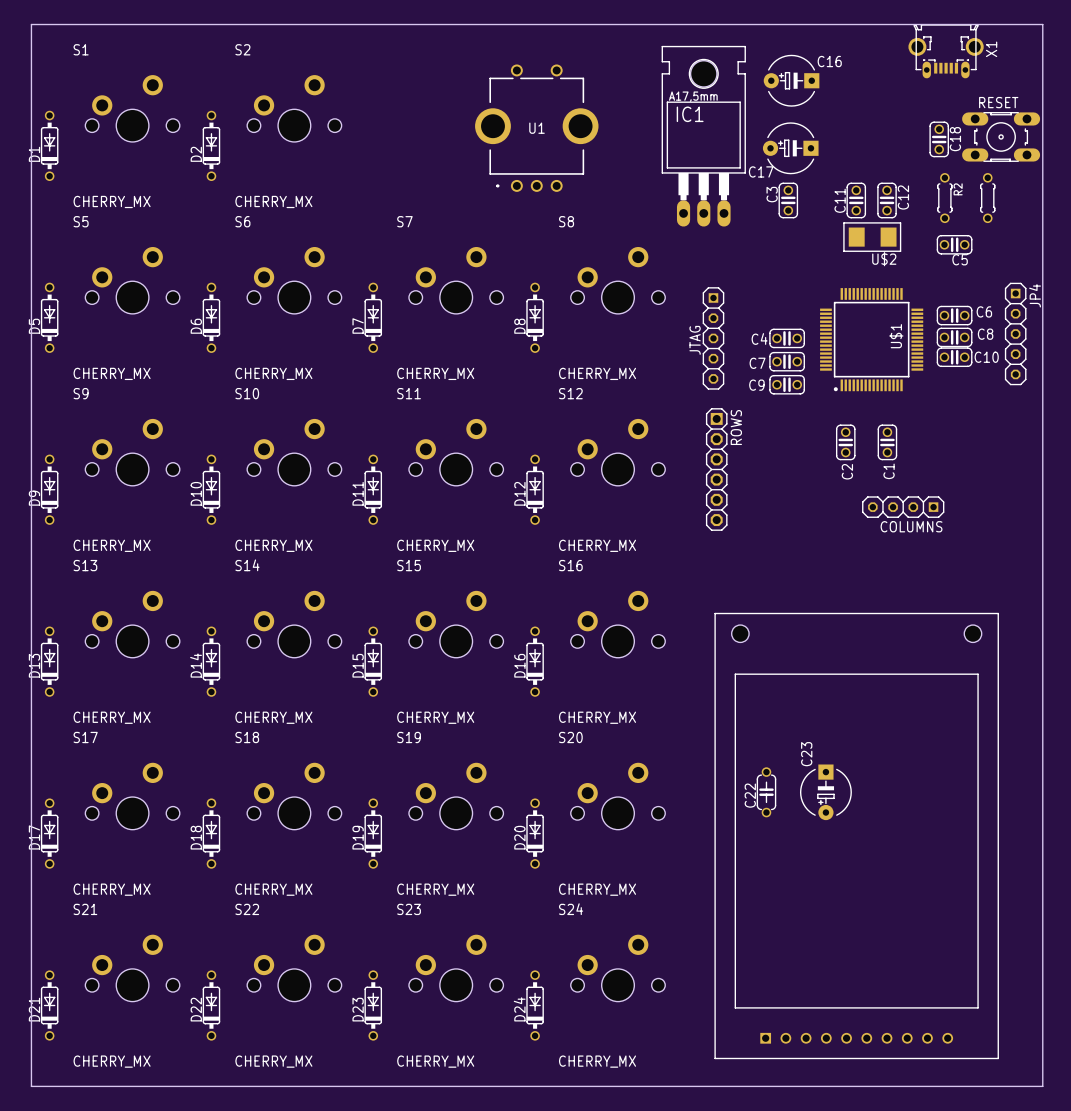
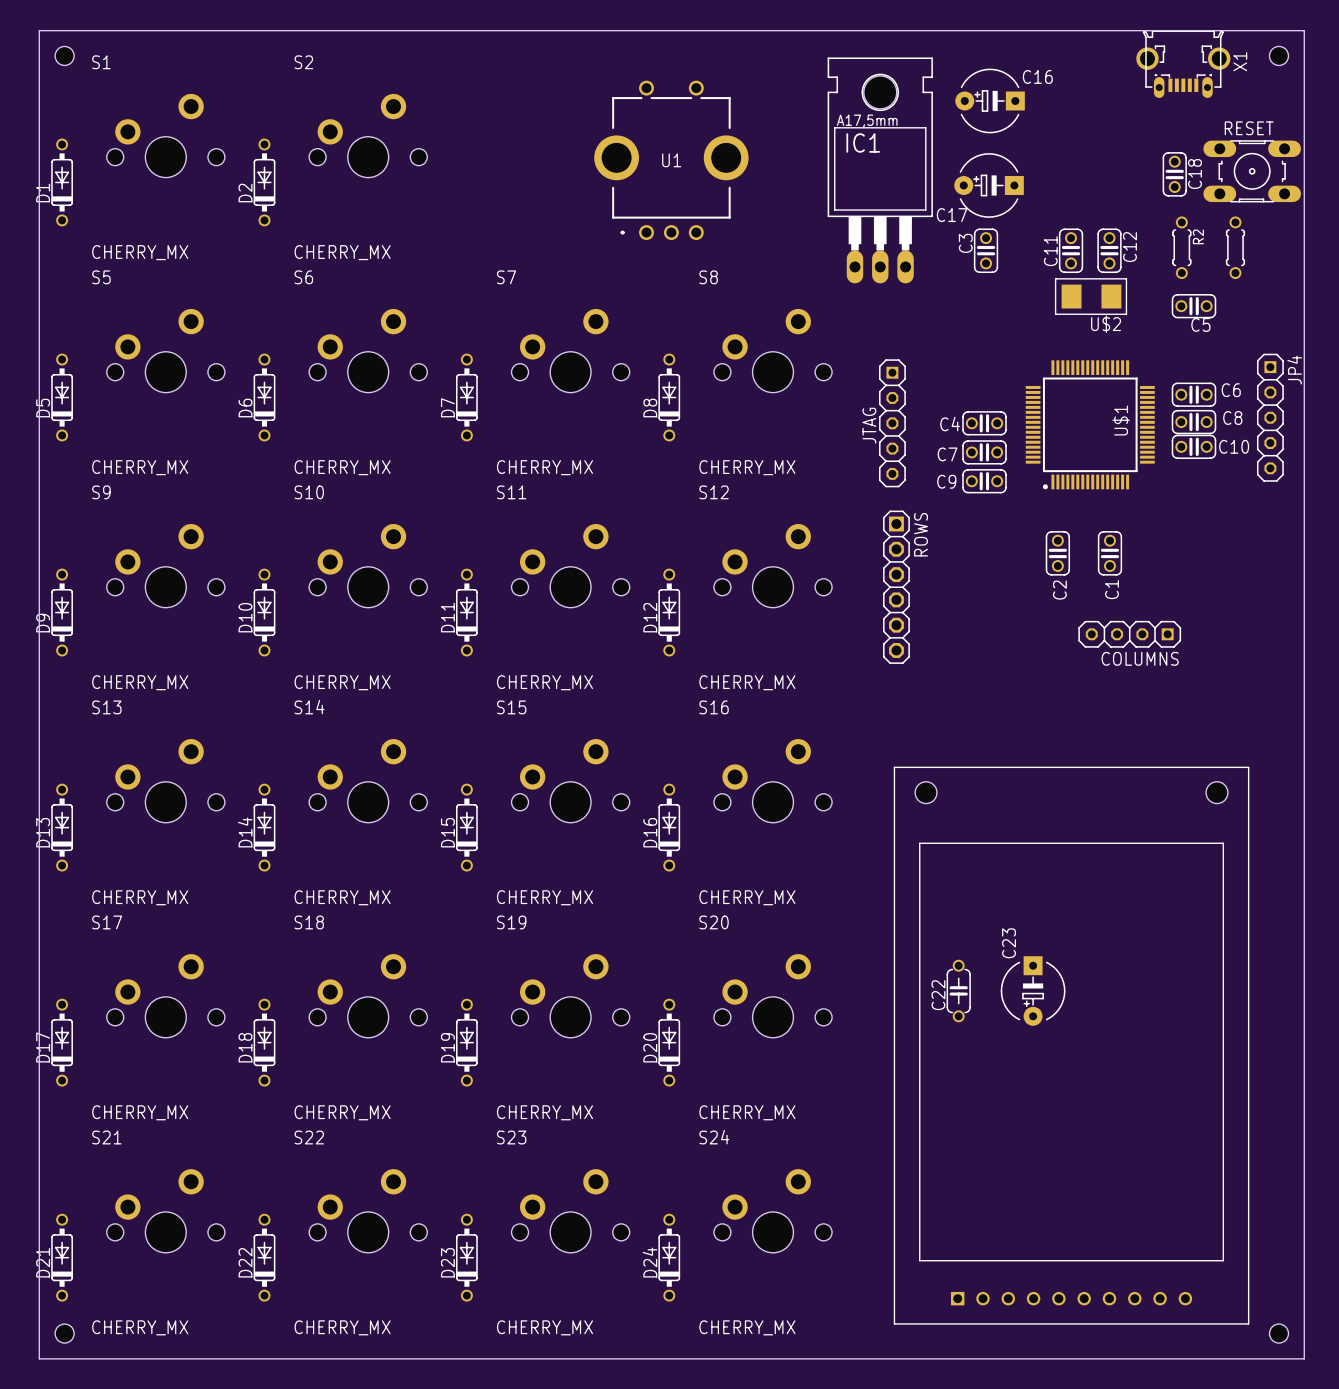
hole: none -> (64, 55)
hole: none -> (1278, 55)
hole: none -> (64, 1333)
hole: none -> (1278, 1333)

